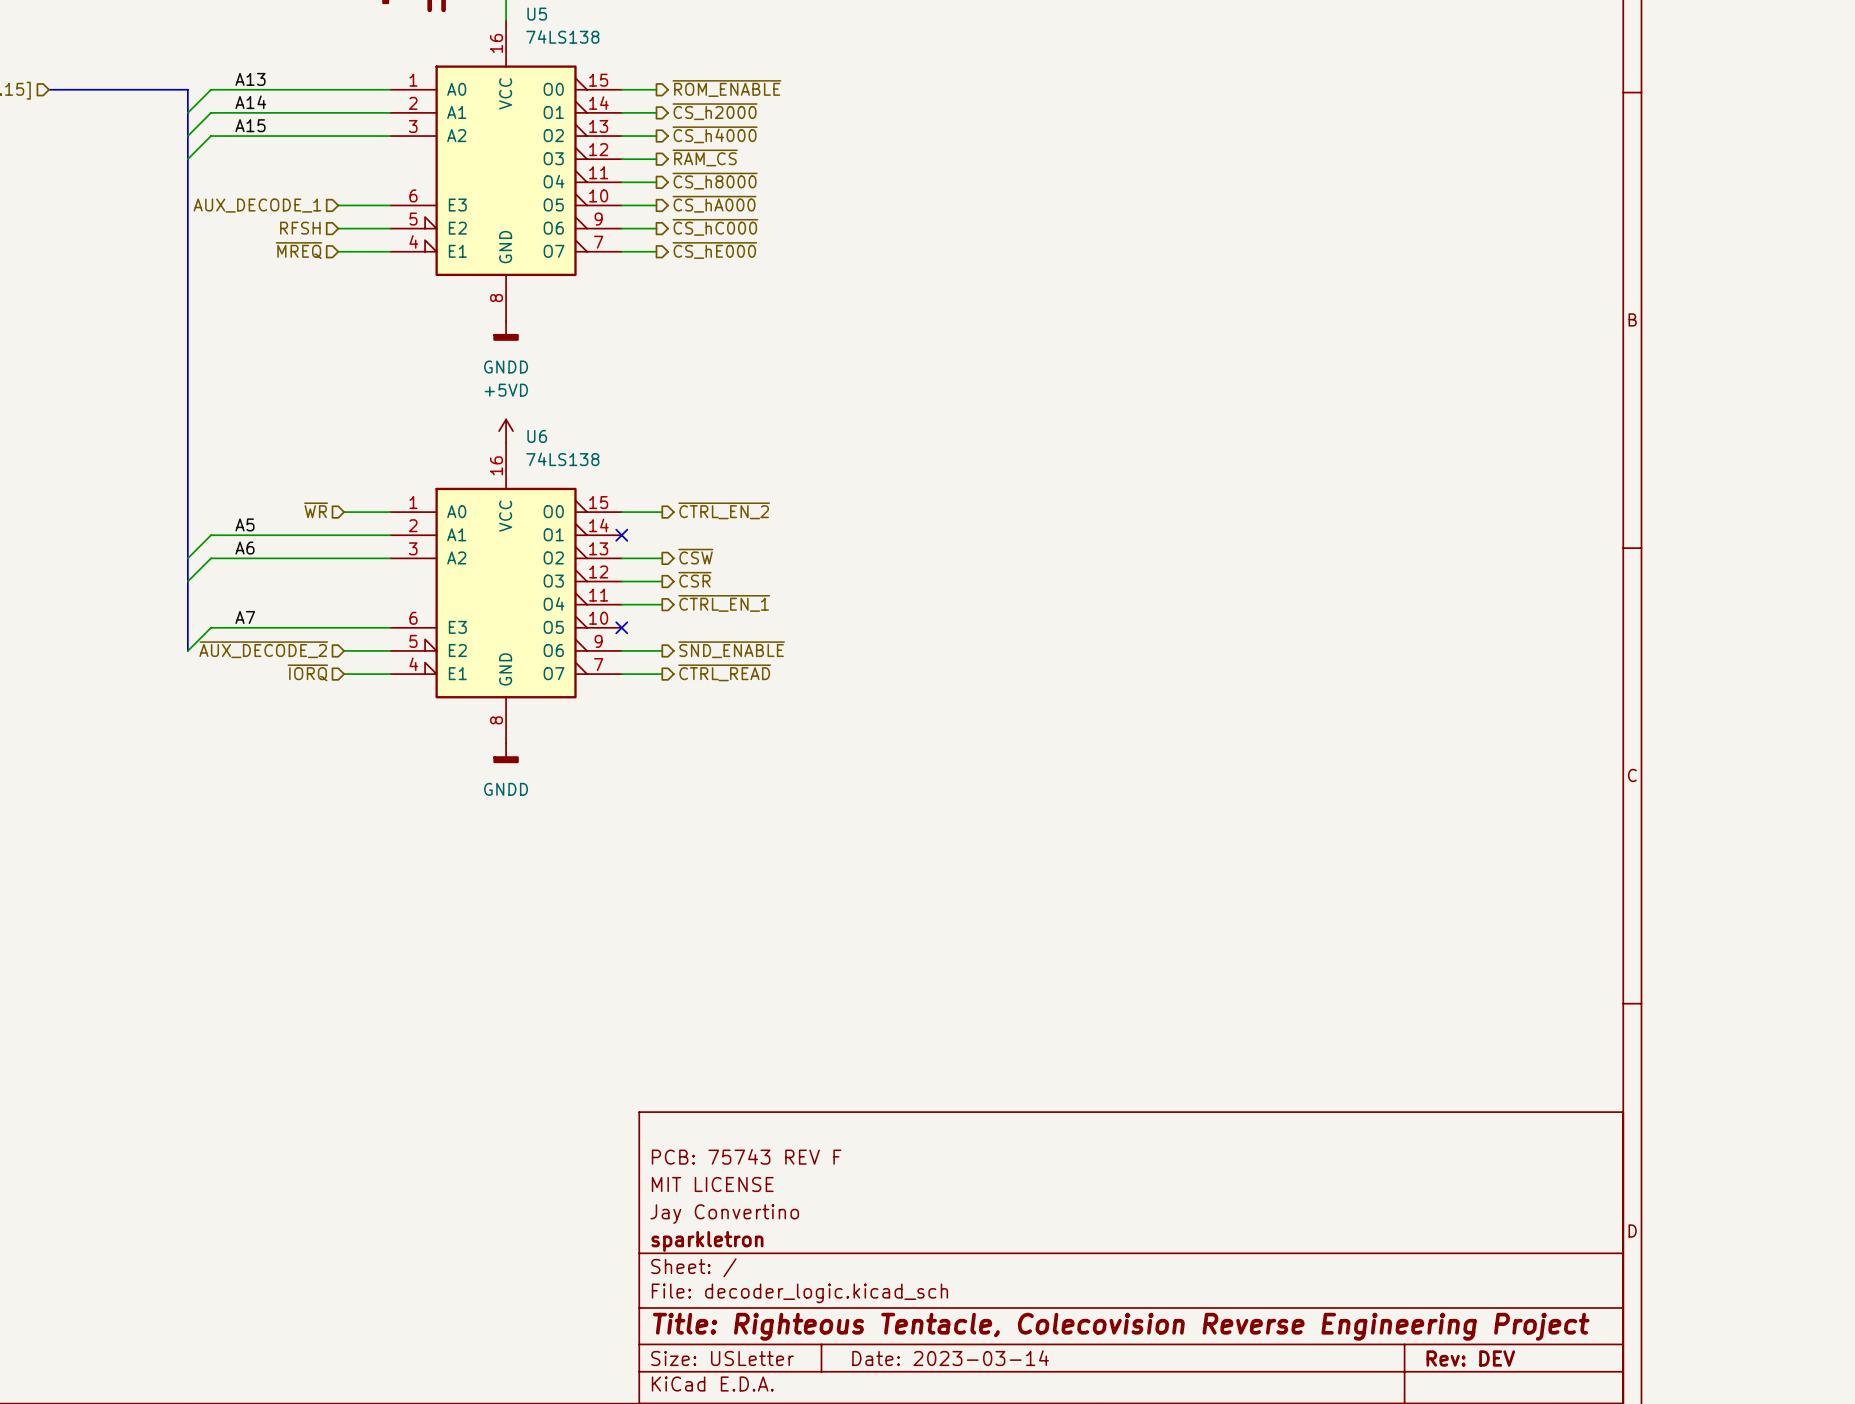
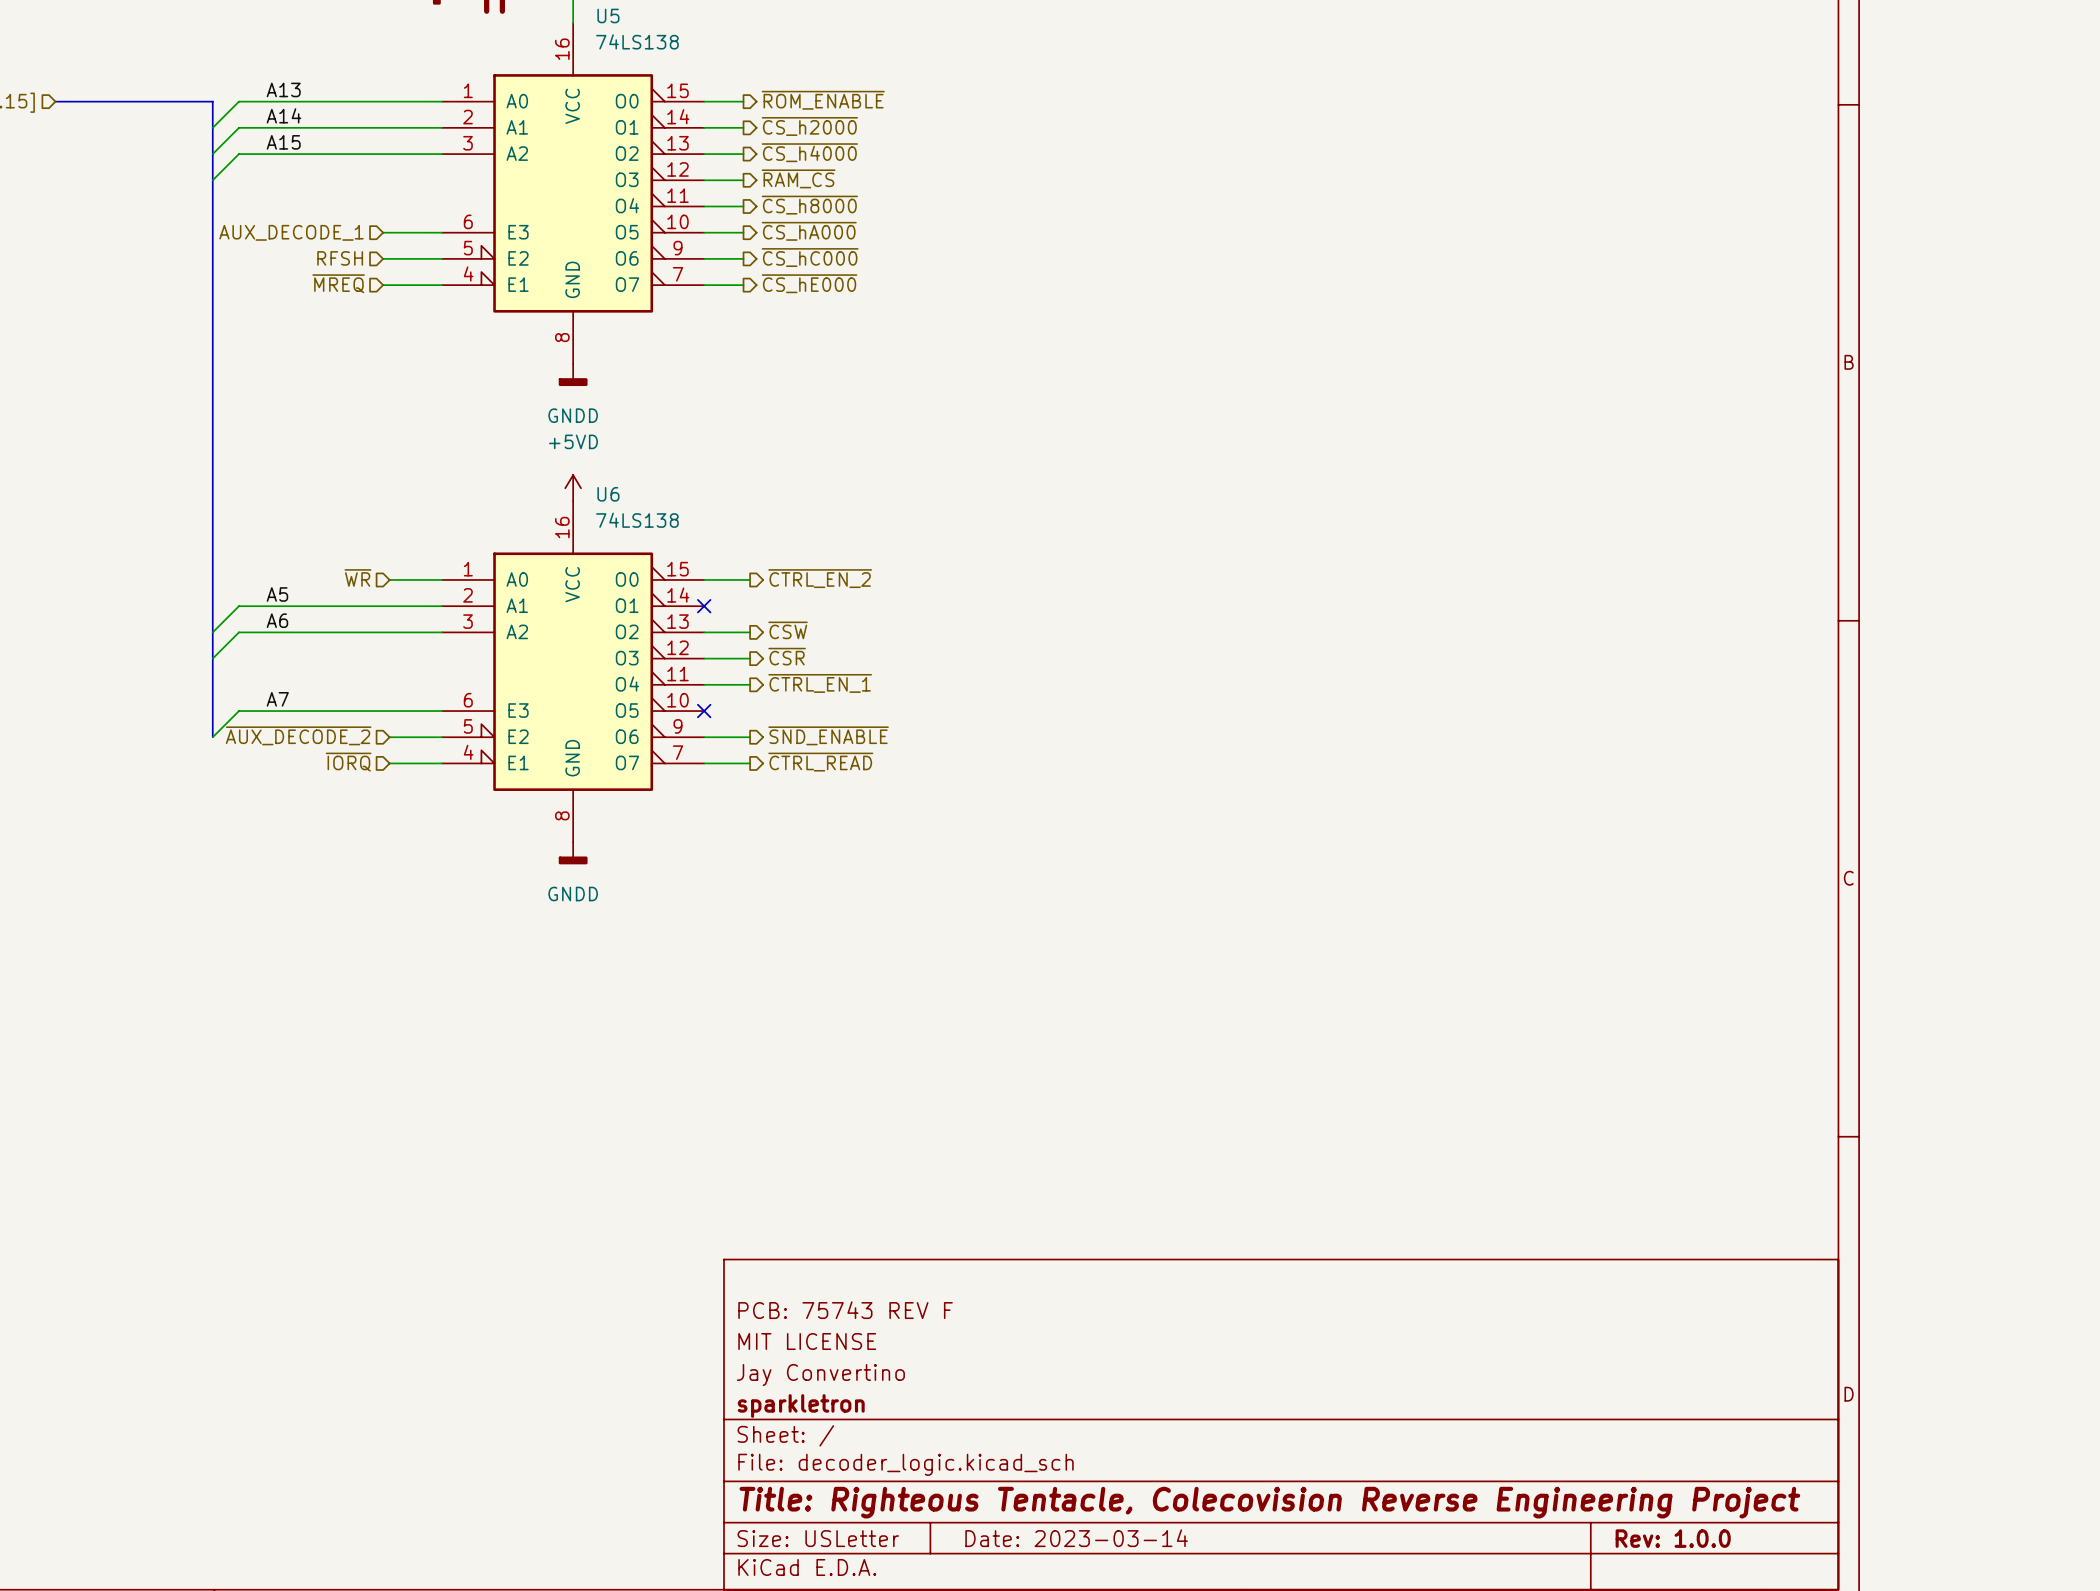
title block: Rev: DEV (1470, 1358) -> Rev: 1.0.0 (1673, 1538)

